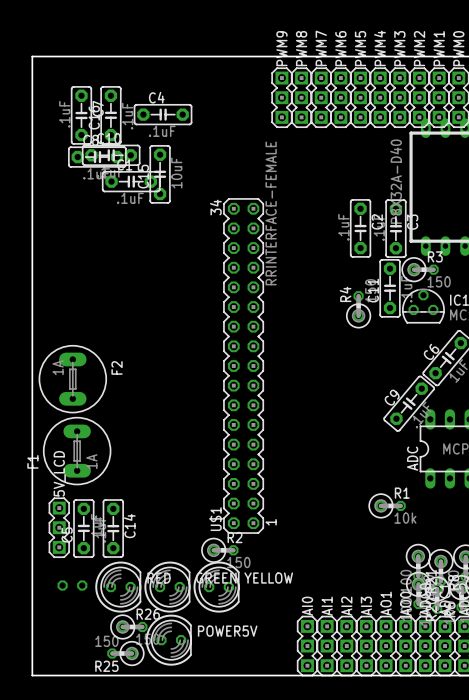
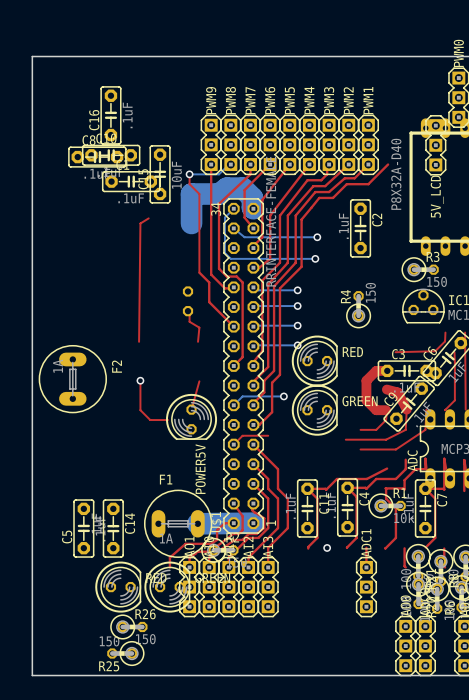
PWM9 position: (281, 97) -> (211, 144)
PWM8 position: (301, 97) -> (230, 144)
PWM7 position: (321, 97) -> (250, 144)
PWM6 position: (340, 97) -> (270, 144)
PWM5 position: (360, 97) -> (289, 144)
PWM4 position: (380, 97) -> (309, 144)
PWM3 position: (399, 97) -> (329, 144)
PWM2 position: (419, 97) -> (348, 144)
PWM1 position: (439, 97) -> (368, 144)
C4 rotation: 0° (163, 114) -> 90° clockwise (347, 507)
C4 position: (163, 114) -> (347, 507)
C7 position: (81, 115) -> (425, 508)
top track: none -> (211, 164) (211, 274) (224, 288) (233, 287)
bottom track: none -> (230, 164) (219, 174) (189, 174)
top track: none -> (250, 164) (250, 174) (219, 203) (219, 268) (226, 276) (236, 276) (242, 282) (242, 357) (233, 365)
top track: none -> (270, 164) (244, 190) (244, 217) (253, 228)
top track: none -> (289, 164) (262, 199) (262, 237) (253, 248)
top track: none -> (309, 164) (270, 215) (270, 258) (259, 267) (253, 267)
top track: none -> (329, 164) (327, 166) (327, 174) (321, 180) (307, 180) (279, 215) (279, 262) (262, 280) (262, 351) (253, 362) (253, 365)
top track: none -> (348, 164) (325, 186) (313, 186) (287, 215) (287, 262) (268, 284) (268, 366) (253, 381) (253, 385)
top track: none -> (368, 164) (354, 178) (344, 178) (329, 192) (315, 192) (295, 215) (295, 262) (274, 286) (274, 370) (264, 380) (264, 392) (253, 405)
top track: none -> (388, 164) (368, 184) (346, 184) (333, 197) (319, 197) (301, 219) (301, 266) (279, 288) (279, 374) (272, 382) (272, 412) (259, 424) (253, 424)
top track: none -> (189, 174) (189, 184) (199, 194) (199, 272) (209, 282) (209, 302) (233, 326)
via: none -> (189, 174)
bottom track: none -> (233, 208) (224, 217) (224, 252) (230, 258) (315, 258)
bottom track: none -> (253, 208) (252, 197) (242, 188) (226, 188) (219, 194) (191, 194) (191, 223) (187, 218)
top track: none -> (148, 218) (140, 223) (139, 341)
bottom track: none -> (233, 228) (244, 237) (317, 237)
C3 rotation: 0° (395, 228) -> 90° counterclockwise (406, 370)
C3 position: (395, 228) -> (406, 370)
via: none -> (317, 237)
via: none -> (315, 258)
bottom track: none -> (253, 287) (258, 290) (297, 290)
C11 rotation: 0° (390, 288) -> 180° (307, 508)
C11 position: (390, 288) -> (307, 508)
via: none -> (297, 290)
part: none -> (187, 301)
bottom track: none -> (297, 306) (253, 307)
via: none -> (297, 306)
top track: none -> (187, 311) (189, 321) (199, 327) (198, 341)
bottom track: none -> (297, 325) (253, 326)
via: none -> (297, 325)
top track: none -> (445, 332) (445, 341) (435, 351) (395, 352)
top track: none -> (465, 332) (465, 409)
bottom track: none -> (297, 345) (253, 346)
via: none -> (297, 345)
top track: none -> (454, 352) (454, 400) (446, 409)
RED: none -> (314, 361)
top track: none -> (387, 370) (376, 370) (366, 380) (366, 400) (376, 410) (387, 409) (386, 420) (376, 429) (360, 429)
top track: none -> (140, 380) (140, 410) (150, 420) (167, 420)
via: none -> (140, 380)
top track: none -> (199, 381) (191, 409)
top track: none -> (386, 389) (397, 392) (406, 409) (405, 429) (386, 439) (345, 439)
bottom track: none -> (283, 396) (242, 396) (233, 405)
via: none -> (283, 396)
top track: none -> (426, 409) (425, 429) (395, 449) (360, 449)
GREEN: none -> (314, 410)
top track: none -> (268, 435) (242, 435) (233, 444)
top track: none -> (253, 444) (278, 469) (278, 488) (287, 498) (287, 528) (268, 547) (268, 567)
F1 rotation: 0° (77, 451) -> 90° clockwise (178, 523)
F1 position: (77, 451) -> (178, 523)
top track: none -> (405, 459) (405, 469) (395, 478) (376, 478) (366, 488) (347, 487) (356, 496) (356, 537) (346, 547)
top track: none -> (253, 464) (268, 478) (268, 488) (278, 498) (278, 528) (248, 557) (248, 567)
top track: none -> (387, 468) (366, 478) (336, 478) (326, 489) (307, 488) (317, 498) (317, 537) (308, 548)
top track: none -> (426, 468) (425, 458) (425, 469) (415, 469) (404, 480) (404, 489) (385, 488) (386, 498) (395, 508) (395, 537) (385, 548)
top track: none -> (446, 468) (444, 458) (444, 489) (425, 488) (435, 498) (435, 537) (425, 547)
top track: none -> (465, 468) (464, 460) (464, 490)
5V_LCD name position: 5V_LCD (59, 473) -> 5V_LCD (437, 196)
top track: none -> (253, 483) (268, 498) (268, 528) (258, 537) (248, 537) (228, 557) (228, 567)
top track: none -> (233, 503) (242, 516) (242, 530) (238, 534) (232, 534) (209, 551) (197, 551) (189, 557) (189, 567)
top track: none -> (253, 503) (252, 510) (264, 518) (264, 528) (256, 534) (248, 534) (242, 539) (234, 539) (209, 557) (209, 567)
top track: none -> (233, 523) (224, 523) (217, 530) (217, 539) (211, 543) (185, 543) (169, 557) (169, 567)
bottom track: none -> (253, 523) (197, 523)
5V_LCD position: (59, 527) -> (435, 145)
via: none -> (327, 547)
top track: none -> (366, 547) (366, 567)
top track: none -> (404, 548) (405, 567)
top track: none -> (444, 548) (445, 567)
part: (72, 585) -> none
YELLOW: (216, 587) -> none
POWER5V rotation: 0° (168, 640) -> 90° clockwise (191, 416)
POWER5V position: (168, 640) -> (191, 416)
AI0 position: (307, 646) -> (209, 587)
AI1 position: (327, 646) -> (228, 587)
AI2 position: (346, 646) -> (248, 587)
AI3 position: (366, 646) -> (268, 587)
AO1 position: (386, 646) -> (189, 587)
ADC1 position: (445, 646) -> (366, 587)

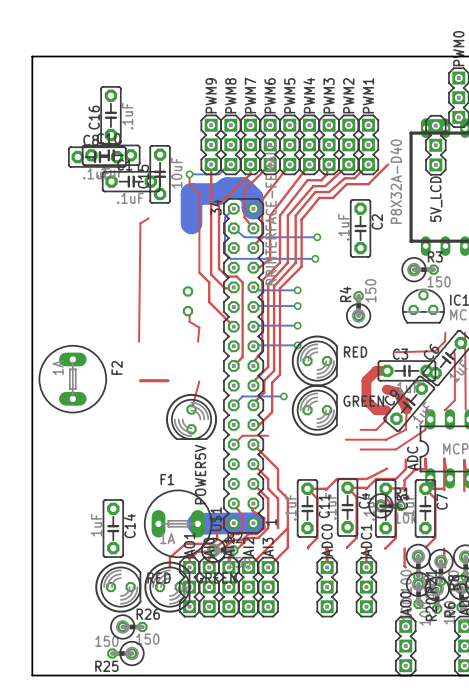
top track: (140, 380) (140, 410) (150, 420) (167, 420) -> (140, 380) (167, 380)
via: (140, 380) -> none
C5 rotation: 0° (83, 528) -> 180° (385, 508)
C5 position: (83, 528) -> (385, 508)
top track: (278, 528) (248, 557) (248, 567) -> none
top track: none -> (287, 528) (287, 547) (268, 567)
top track: (268, 547) (268, 567) -> (268, 547) (248, 567)
top track: none -> (326, 547) (327, 567)
via: (327, 547) -> none
ADC0 position: (425, 646) -> (327, 587)

